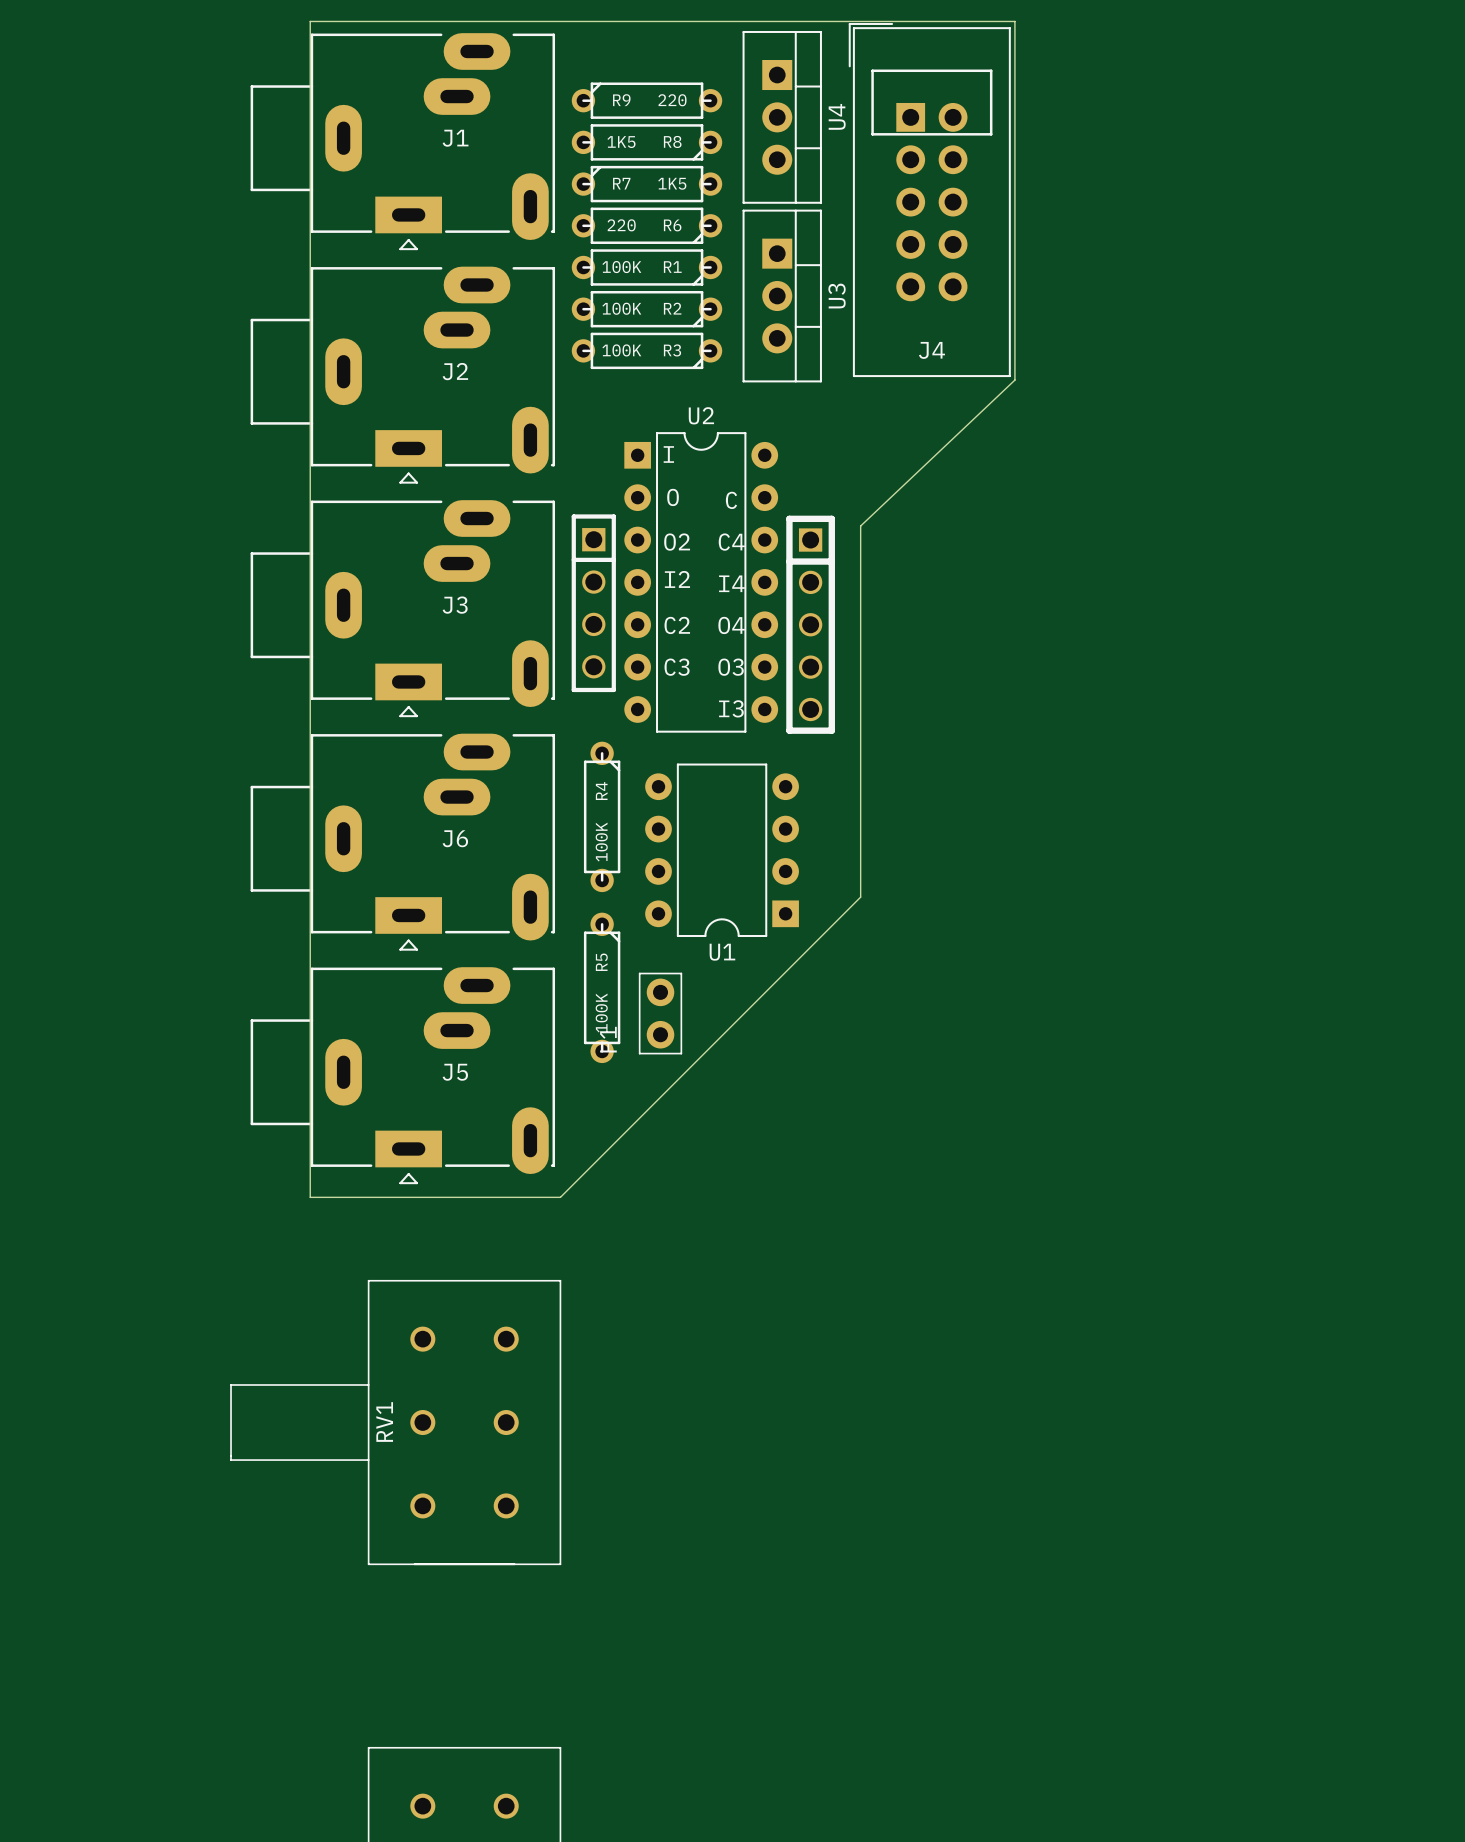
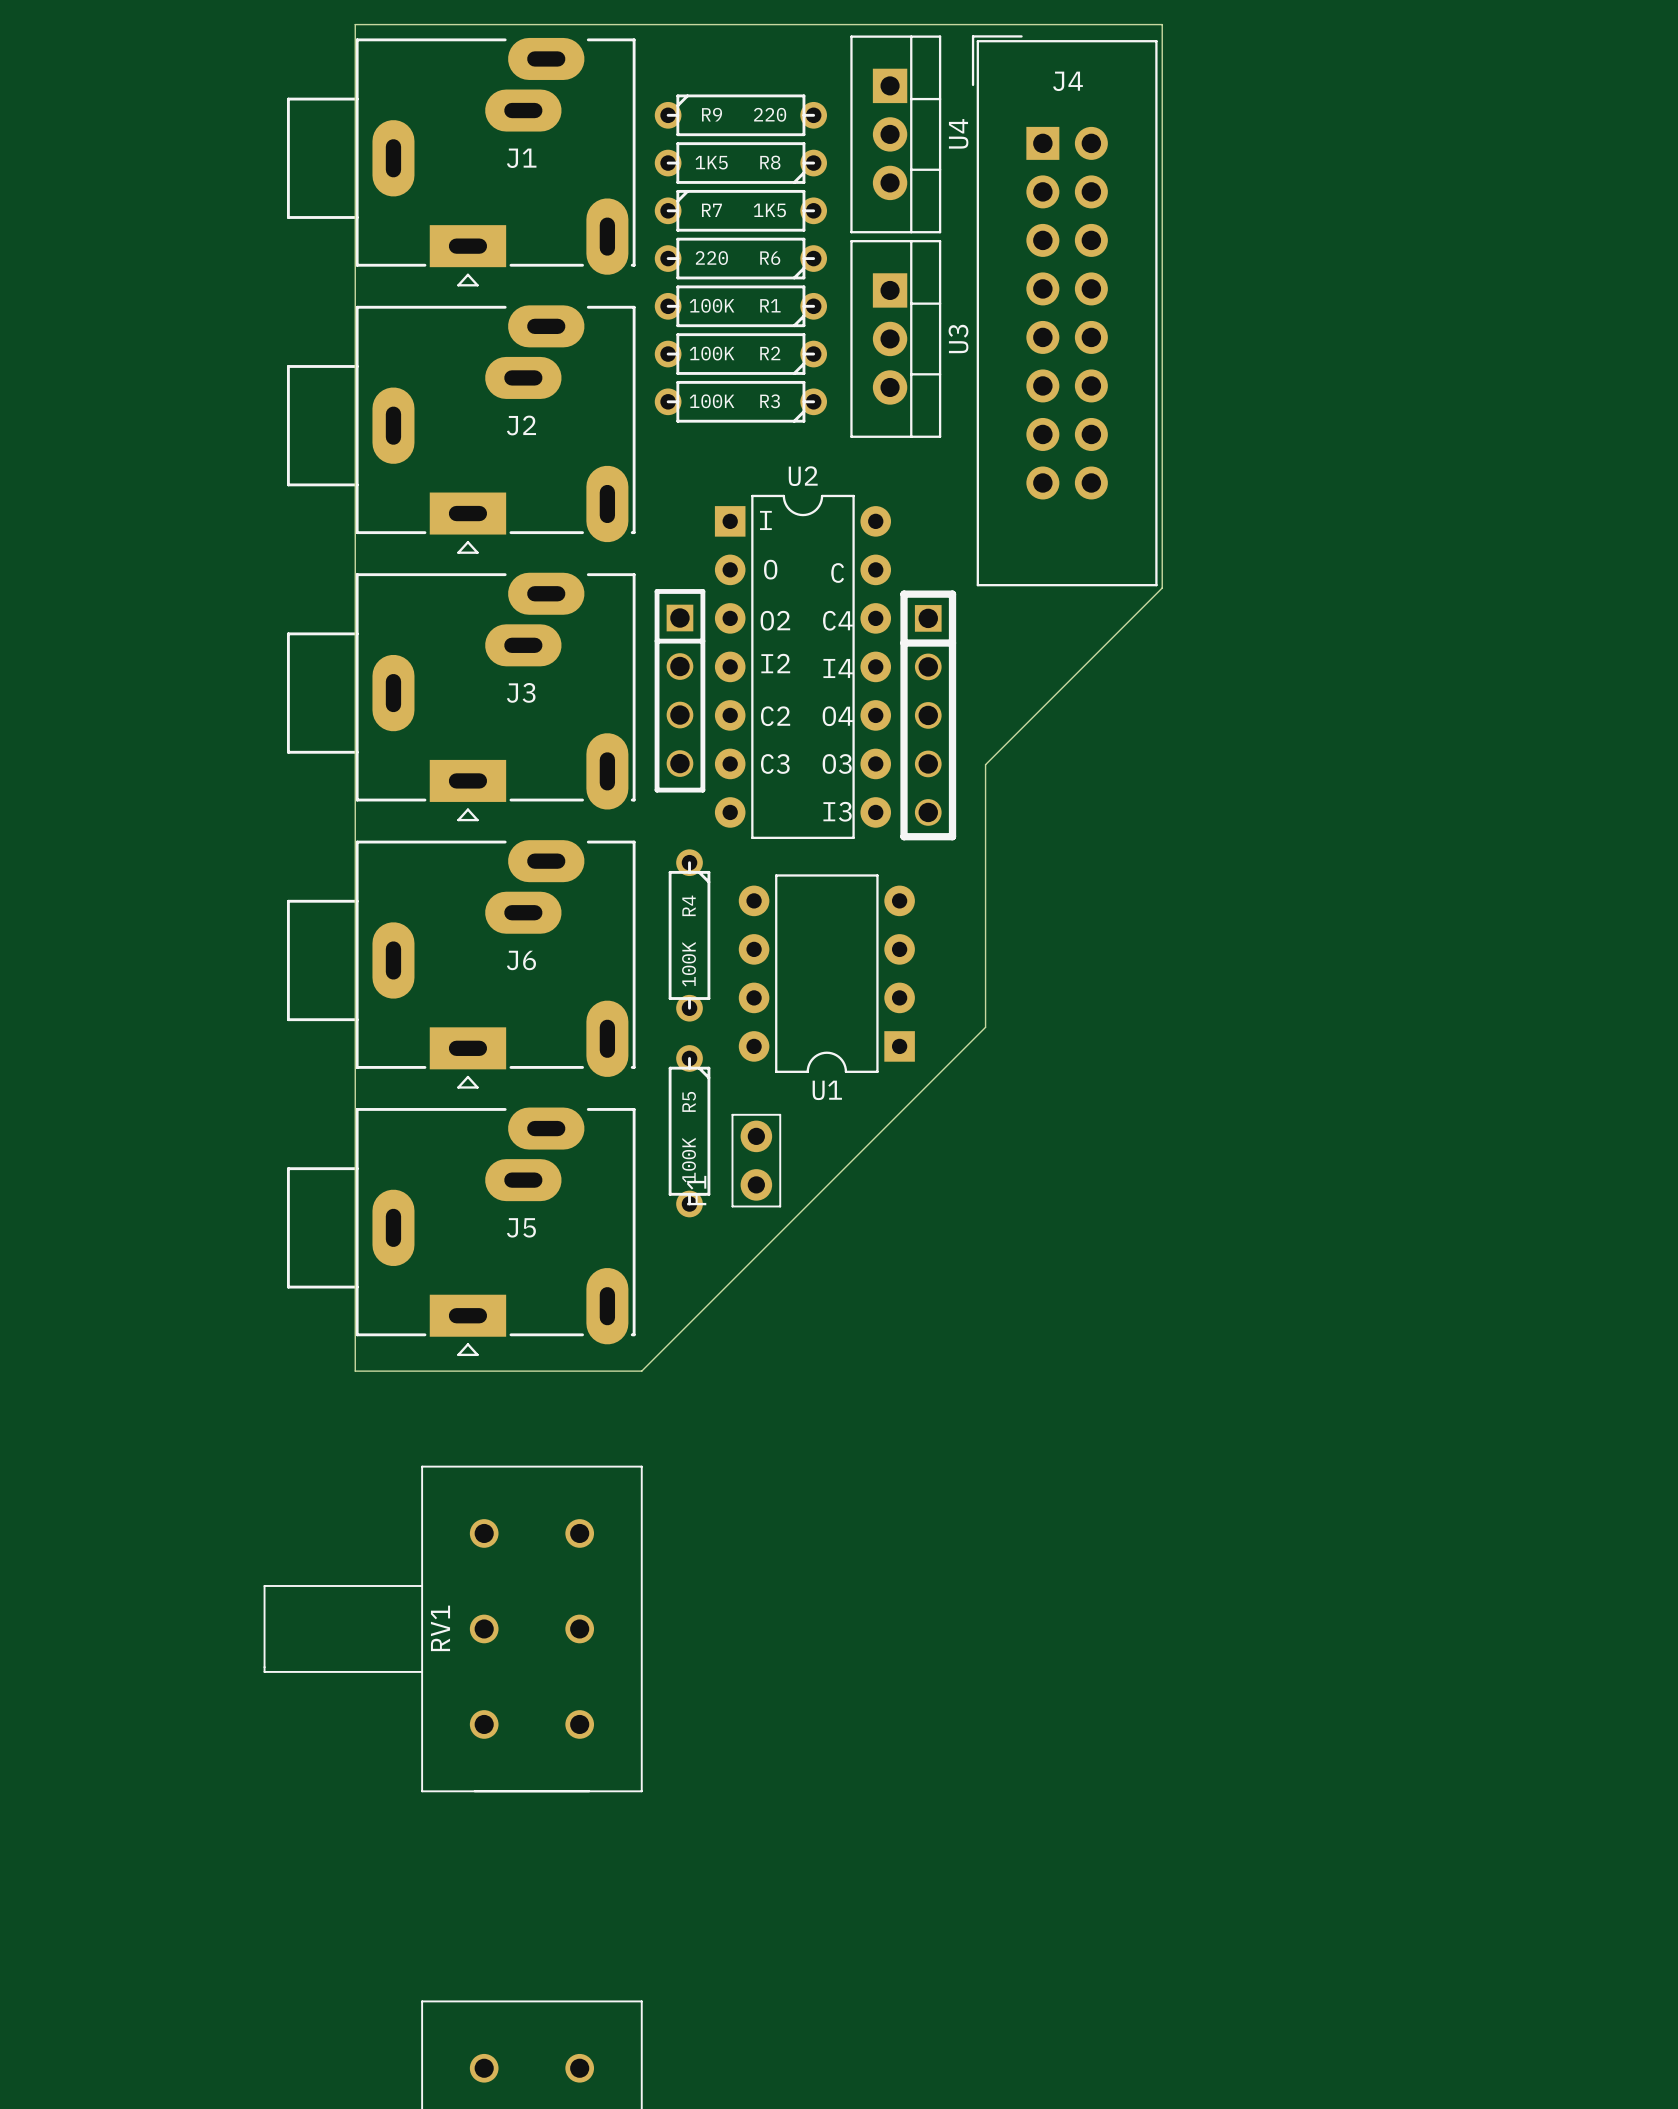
J4 footprint: [848, 22, 1011, 378] -> [971, 35, 1158, 587]
J4 name position: J4 (931, 350) -> J4 (1067, 81)
board edge: (1014, 380) (860, 526) (860, 667) -> (1162, 435) (1162, 588) (985, 764)

